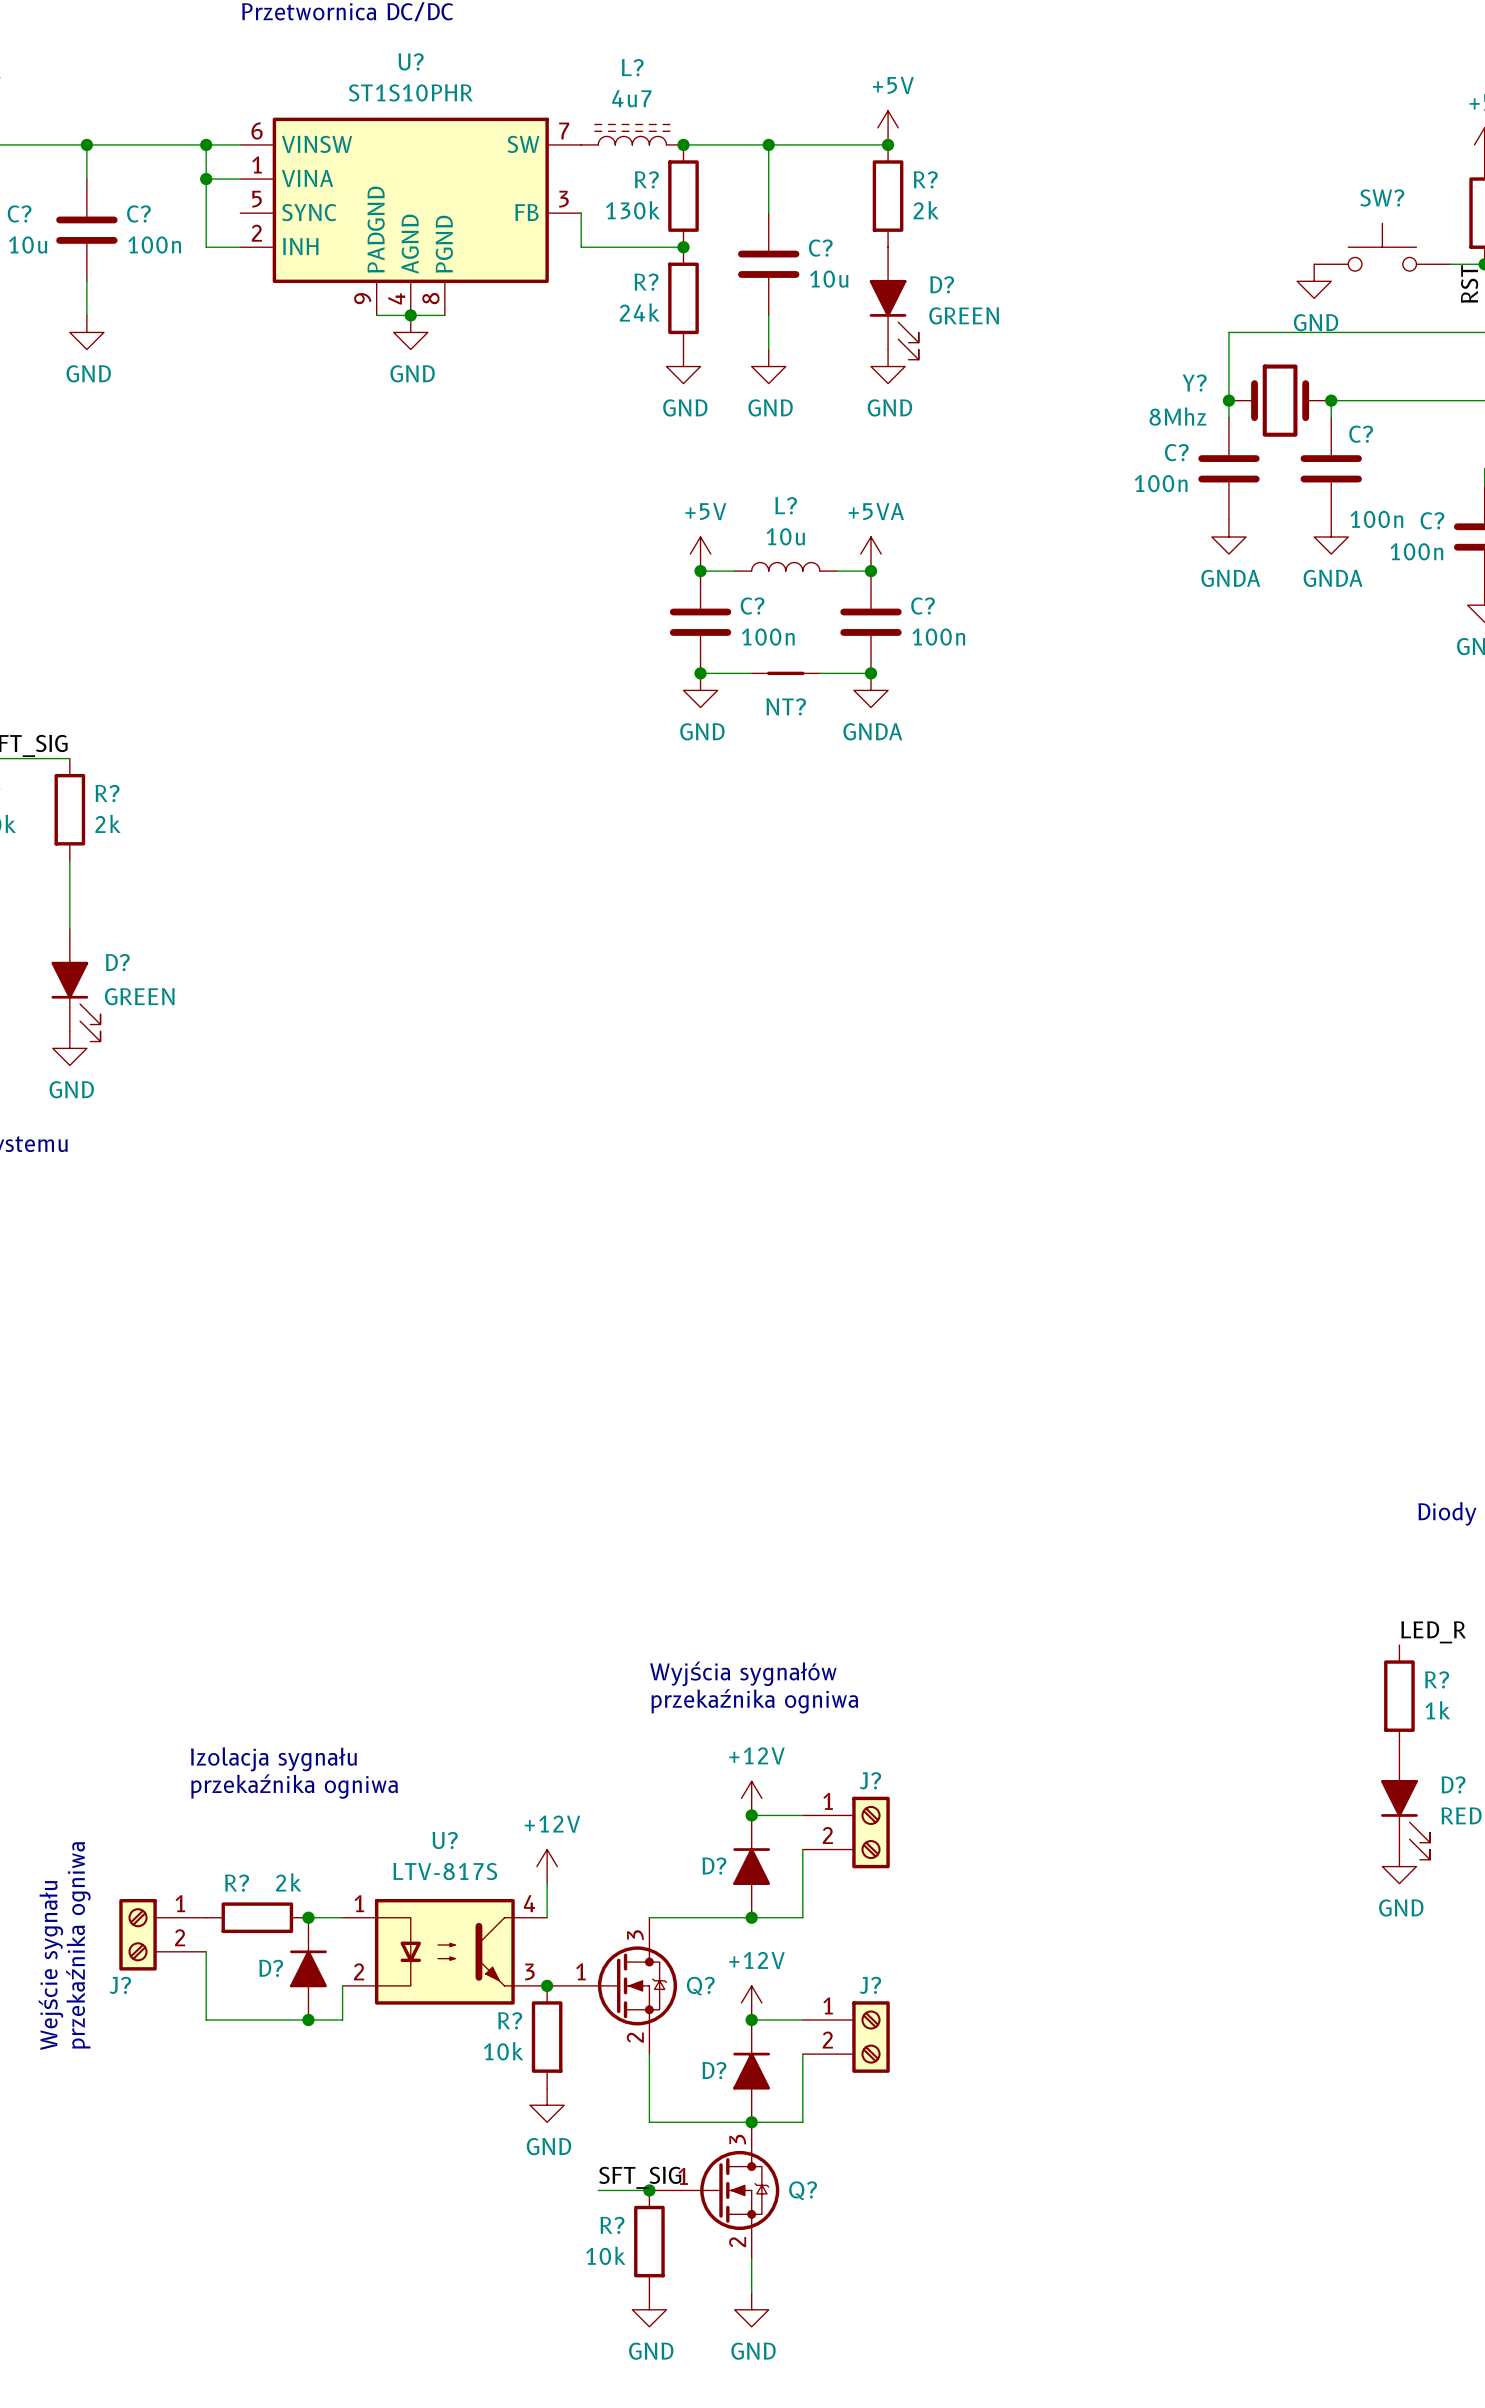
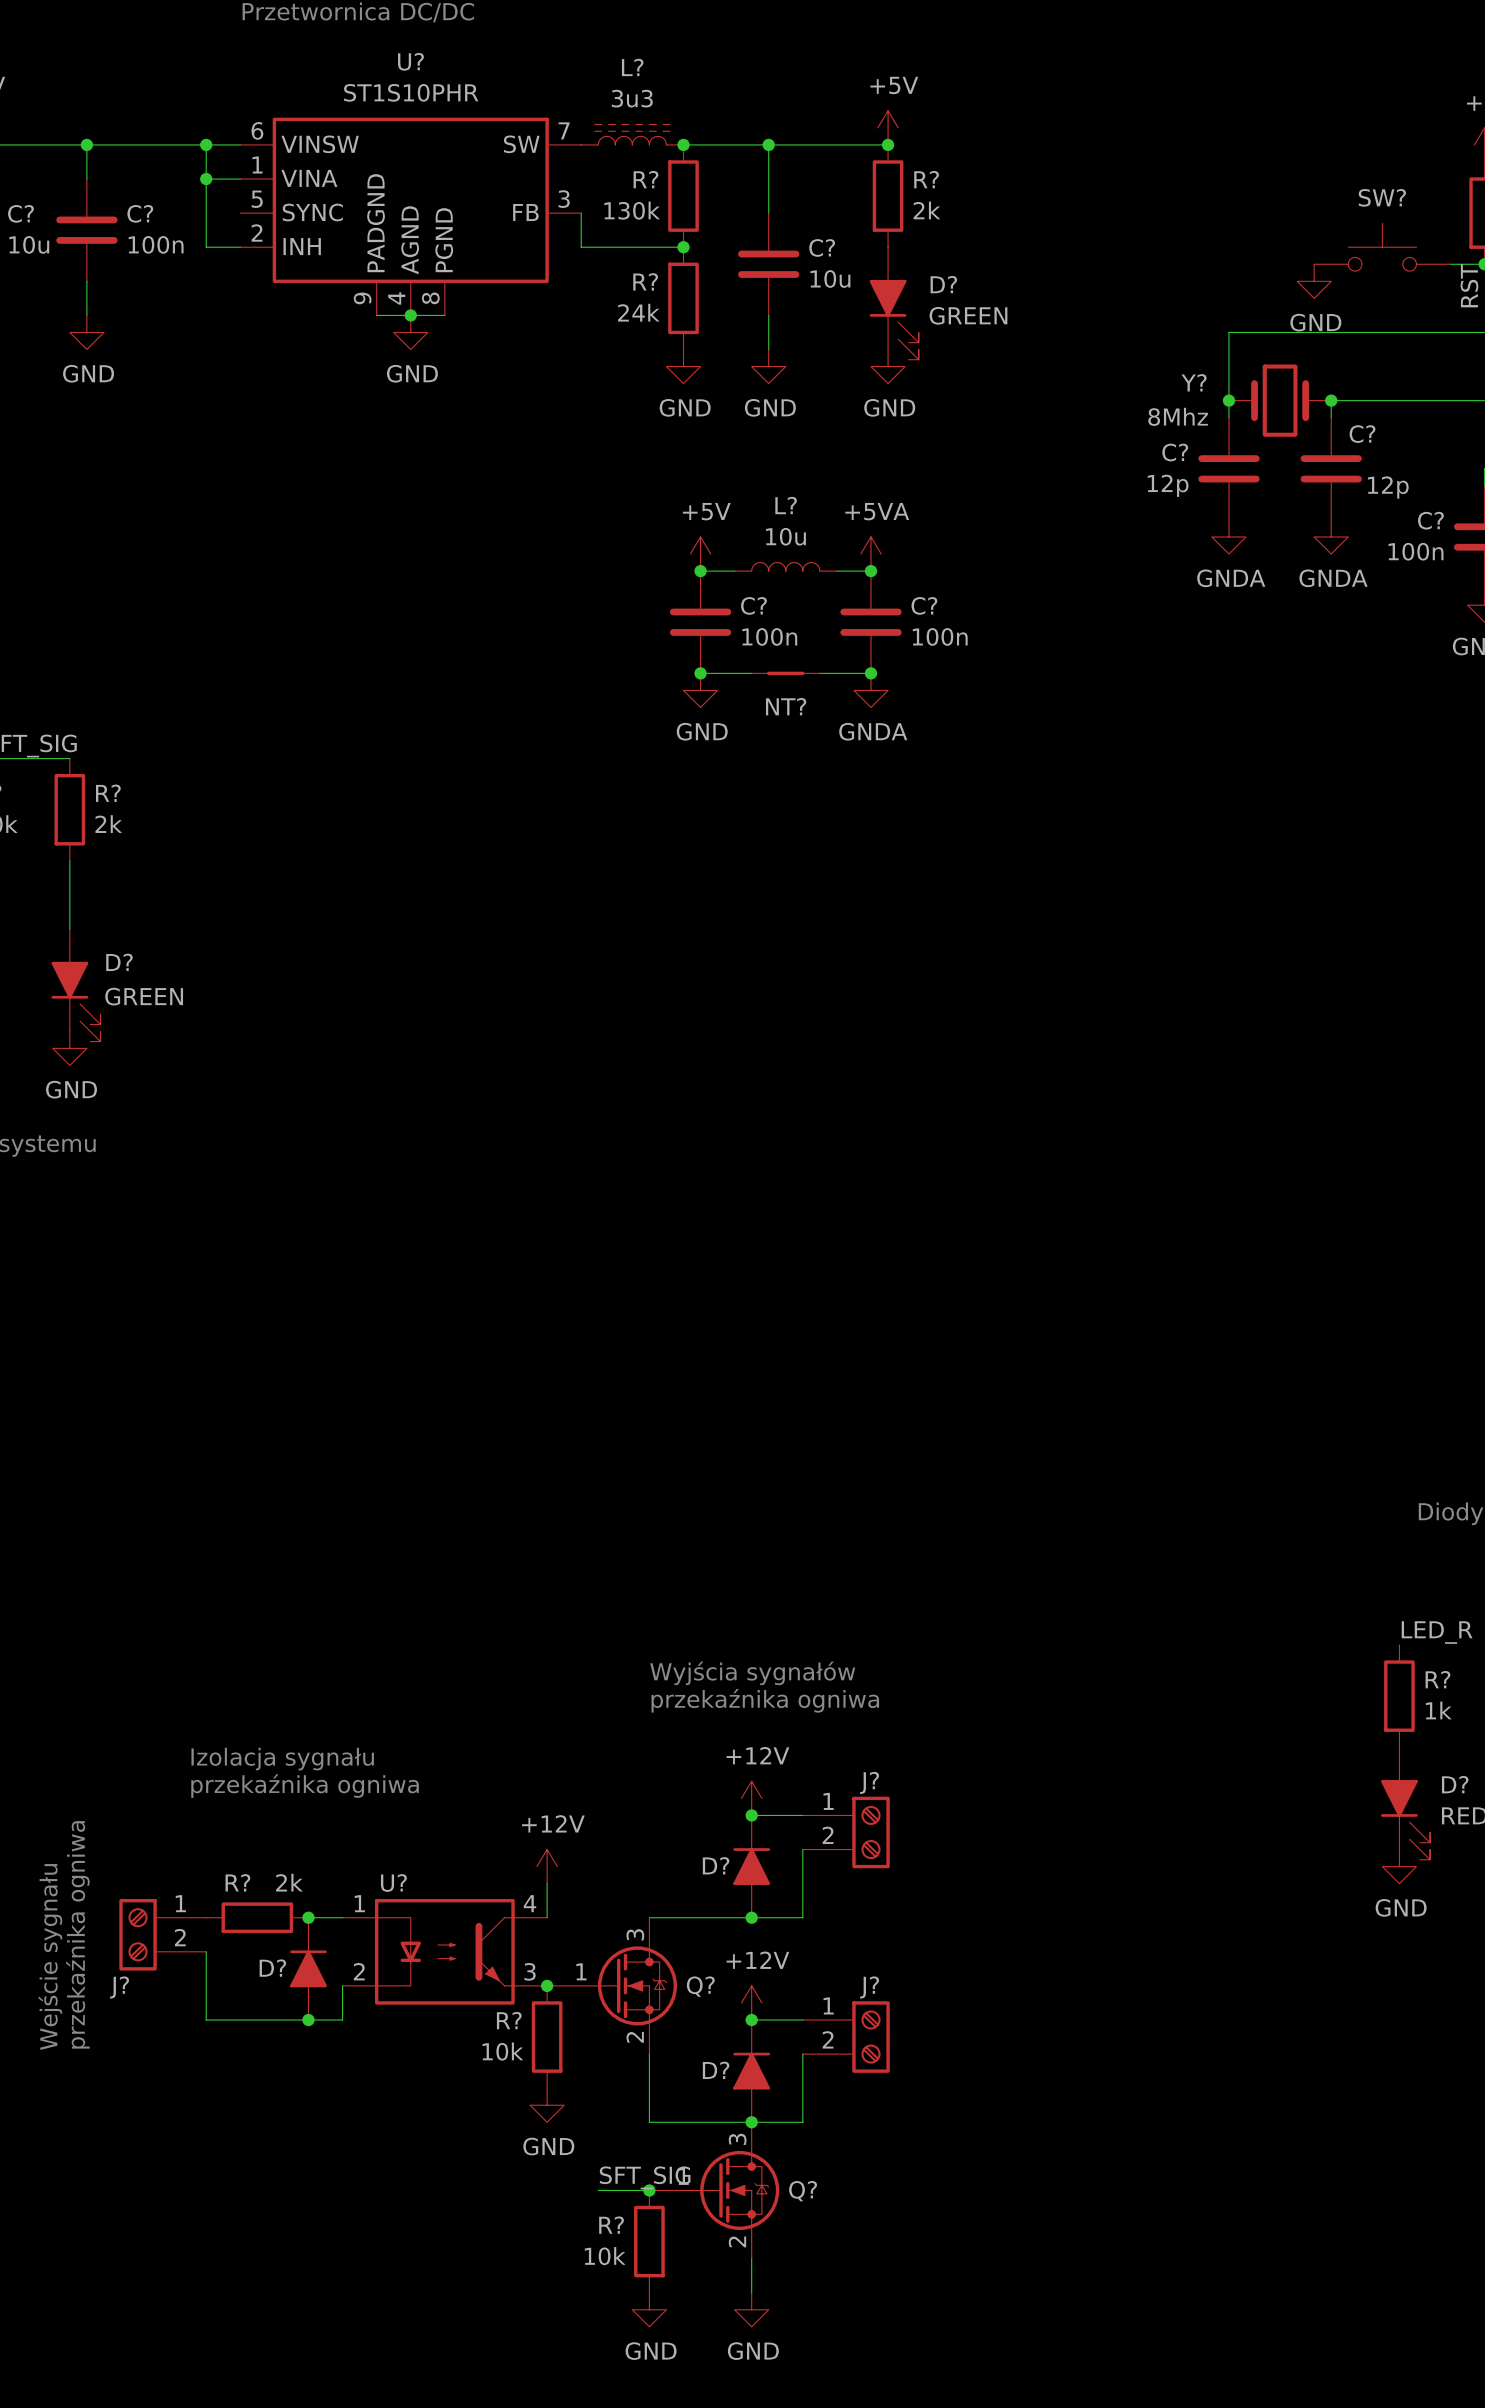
L? value: 4u7 (631, 98) -> 3u3 (632, 98)
C? value: 100n (1161, 483) -> 12p (1168, 485)
C? value: 100n (1376, 519) -> 12p (1388, 487)
U? name position: U? (445, 1840) -> U? (393, 1883)
U? value: LTV-817S (445, 1871) -> none

